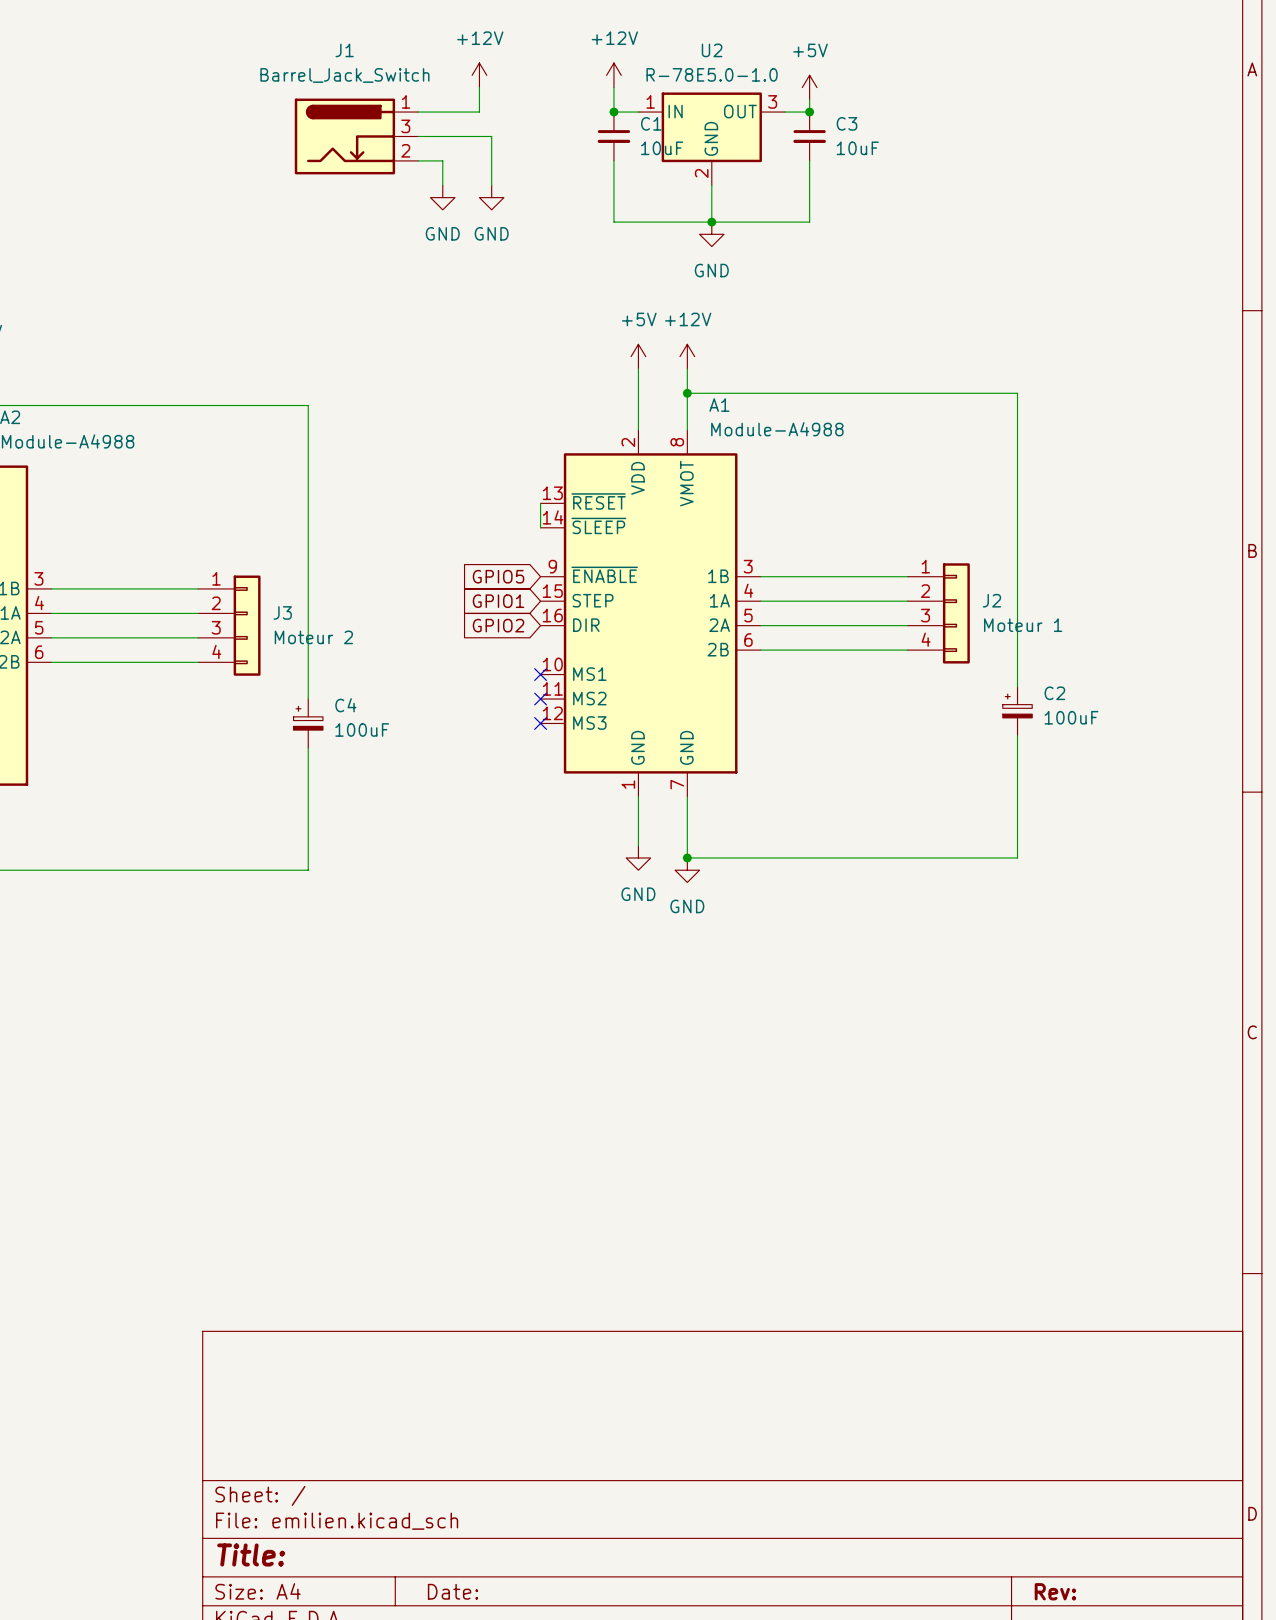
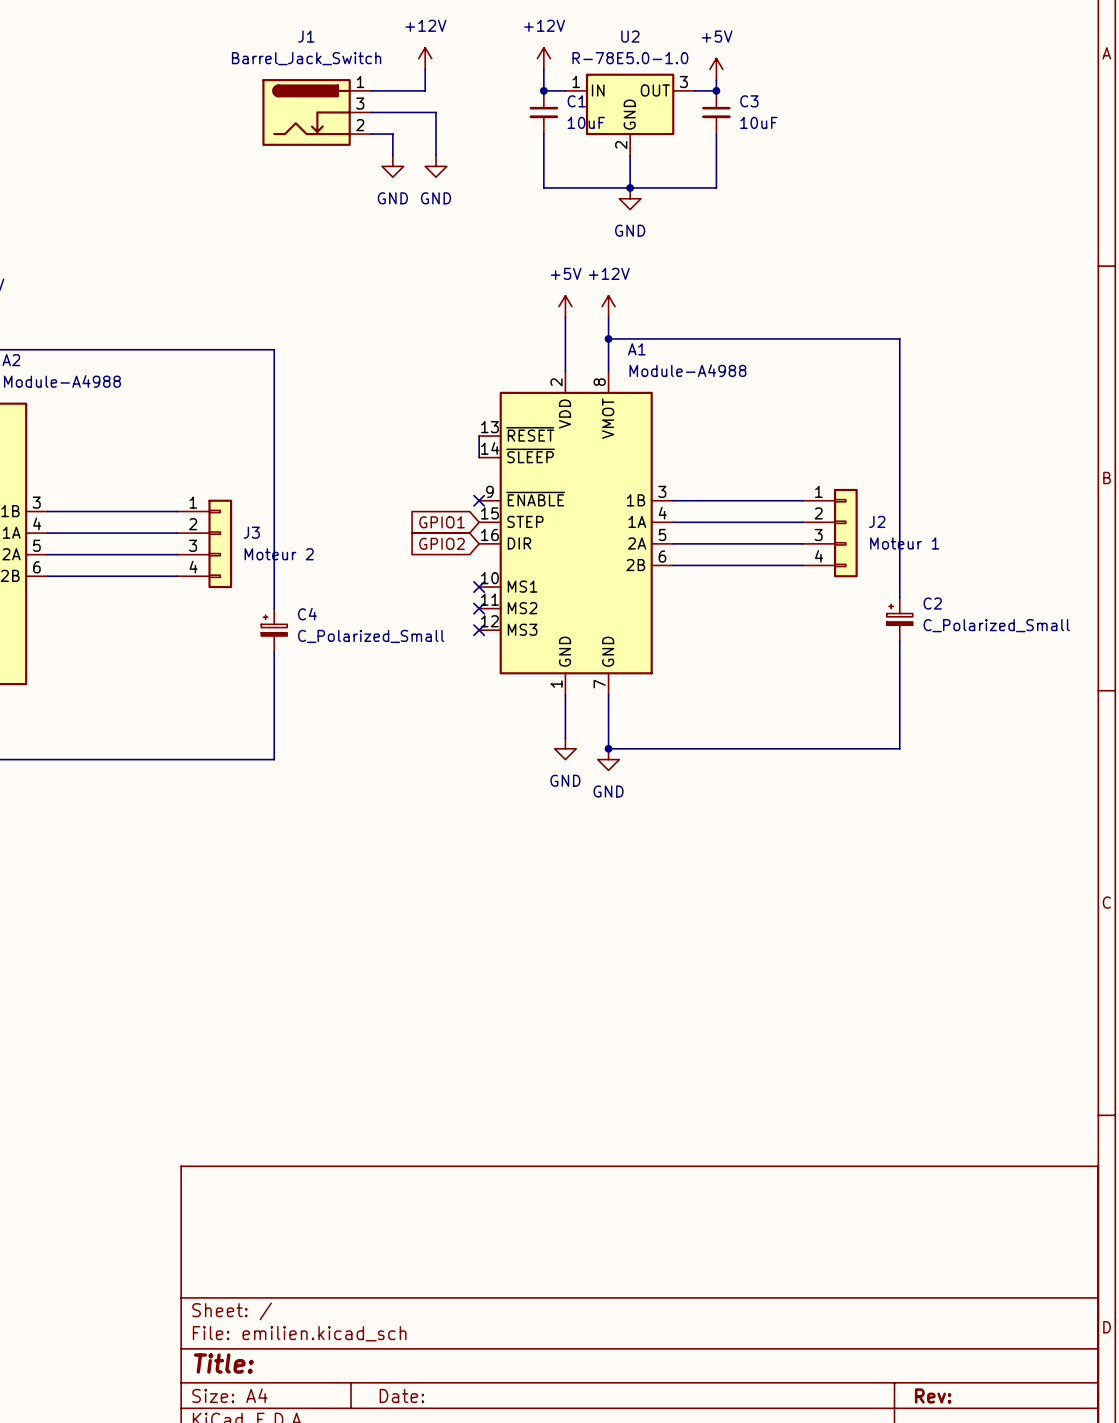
global label: GPIO5 (498, 576) -> none
no-connect mark: none -> (479, 500)
C2 value: 100uF (1071, 717) -> C_Polarized_Small (996, 625)
C4 value: 100uF (362, 729) -> C_Polarized_Small (371, 636)

